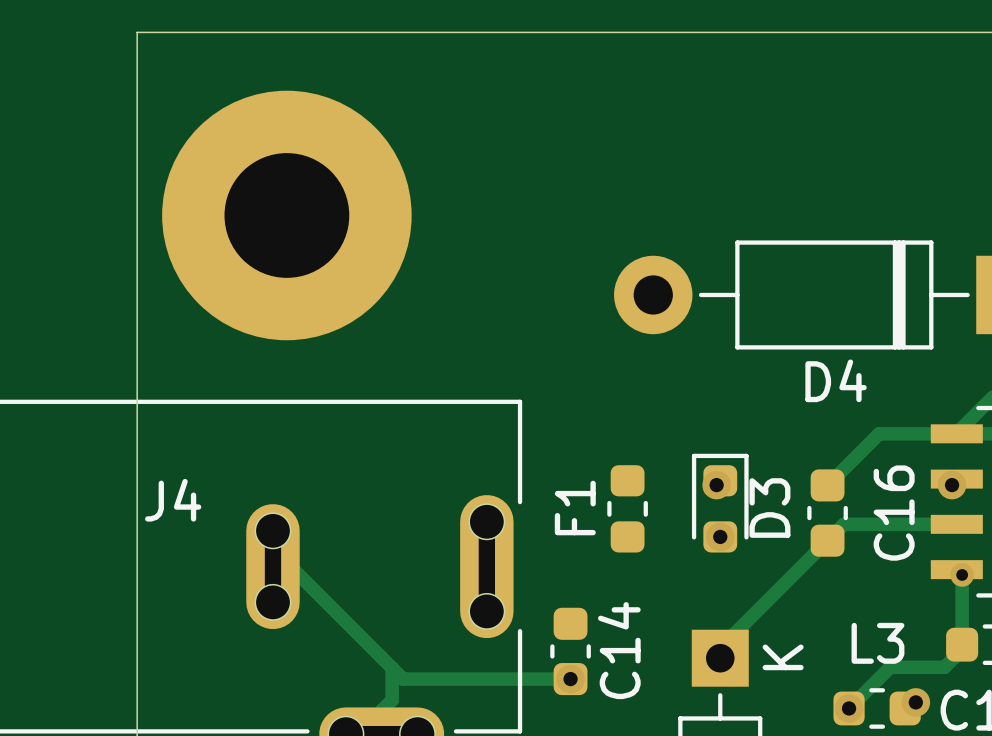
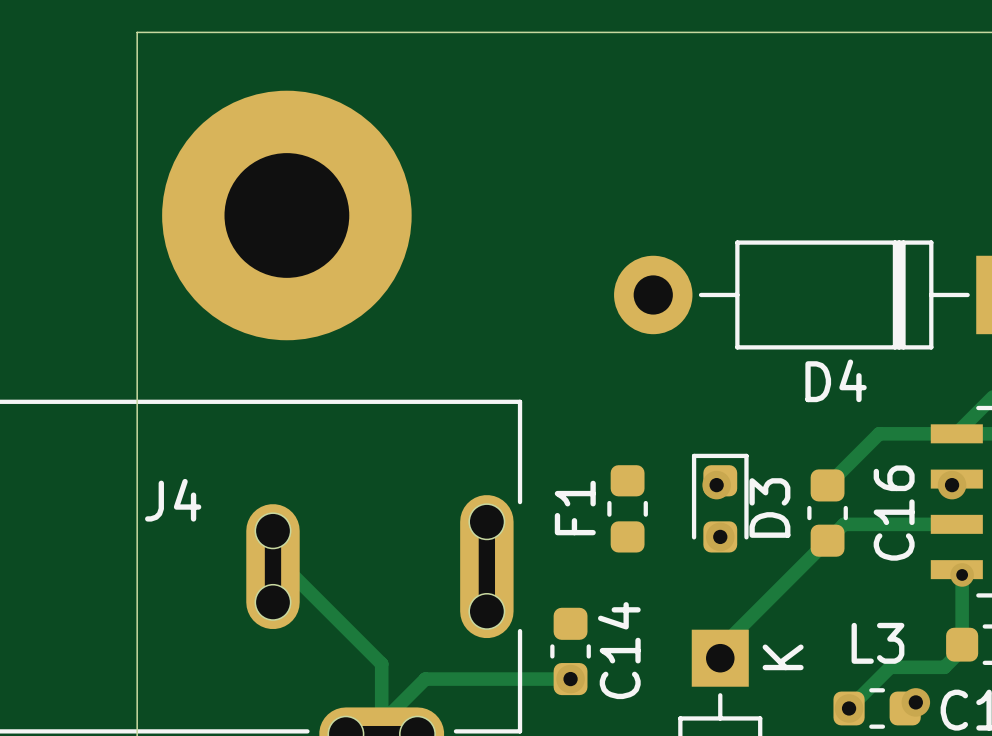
track: (284, 566) (290, 566) (403, 679) (425, 679) -> (284, 566) (381, 663) (381, 710)
track: (392, 668) (392, 700) (381, 710) -> none
track: none -> (425, 679) (381, 722)

